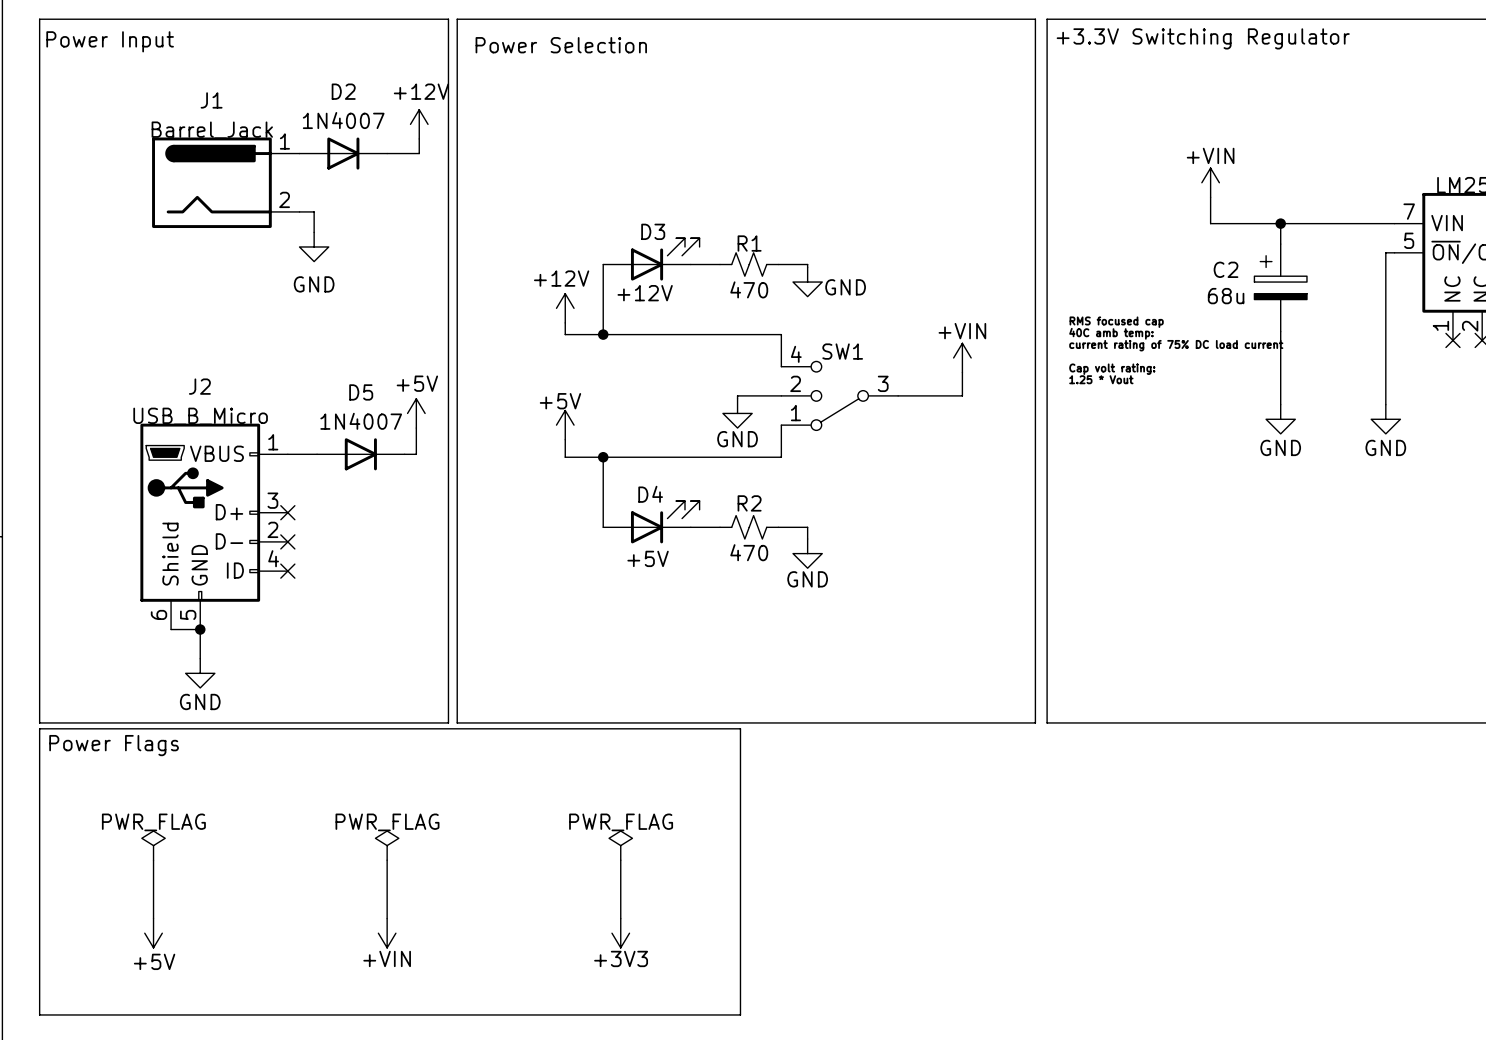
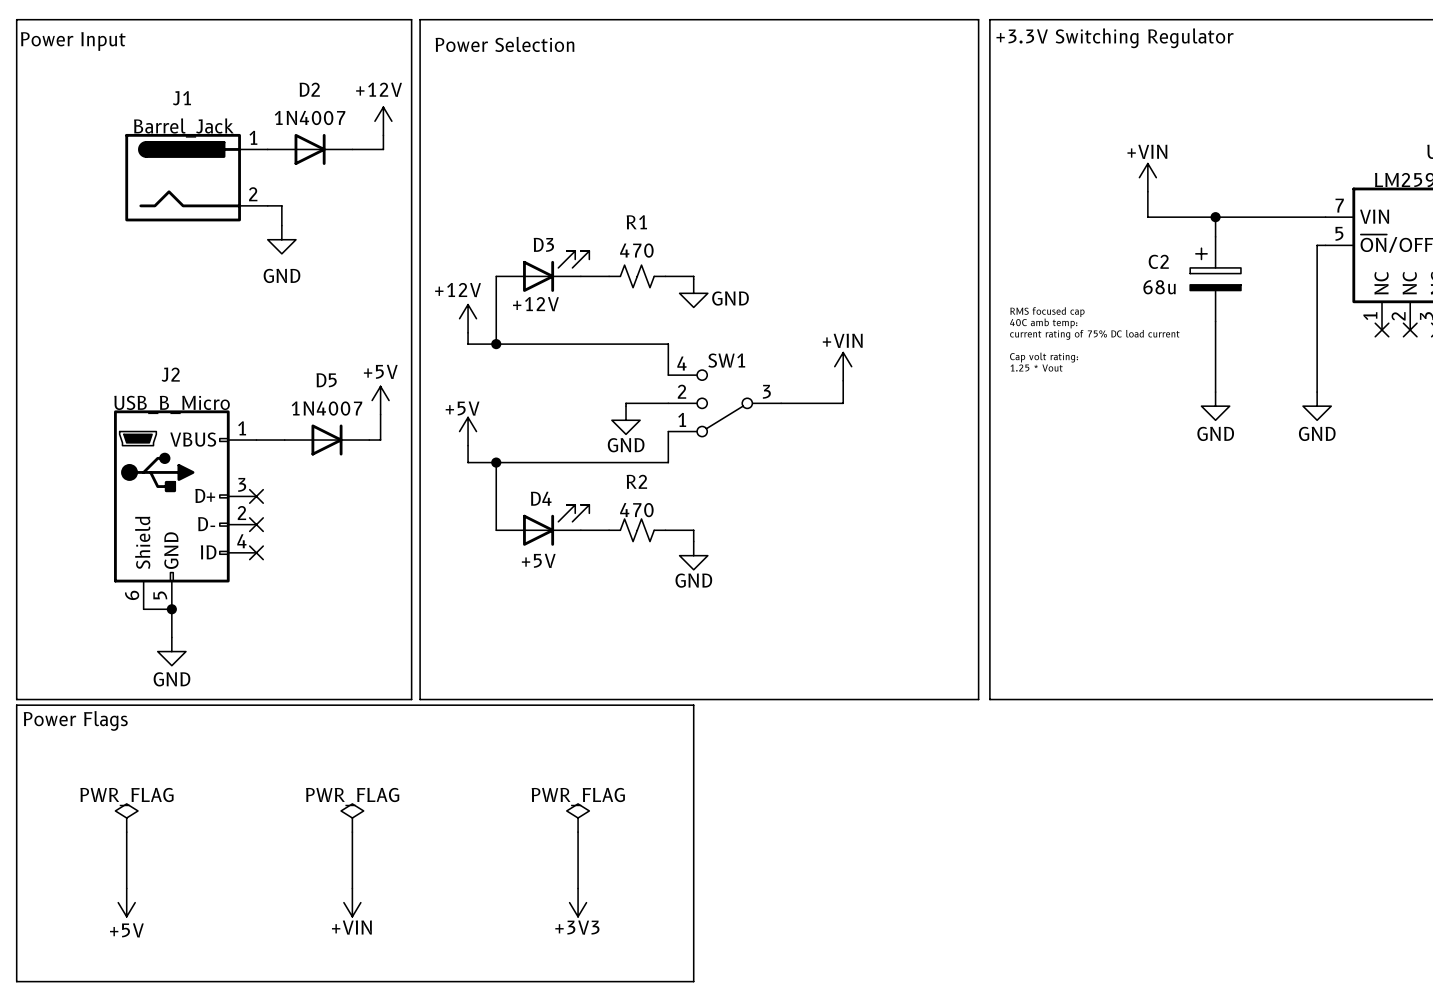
R1 name position: R1 (749, 243) -> R1 (636, 222)
D3 position: (651, 259) -> (542, 271)
wire: (603, 264) (603, 334) -> (496, 276) (496, 344)
wire: (690, 264) (720, 264) -> (580, 276) (609, 276)
R1 position: (749, 264) -> (637, 276)
wire: (778, 264) (807, 264) (807, 267) -> (665, 276) (693, 276) (693, 279)
power symbol: GND (807, 282) -> none
R1 value position: 470 (749, 289) -> 470 (636, 250)
power symbol: none -> GND (693, 293)
power symbol position: +12V (565, 308) -> +12V (468, 318)
wire: (565, 322) (565, 334) (781, 334) (781, 366) -> none
junction: (603, 334) -> none
wire: none -> (468, 332) (468, 344) (668, 344) (668, 375)
junction: none -> (496, 344)
power symbol position: +VIN (962, 357) -> +VIN (843, 366)
wire: (962, 372) (962, 395) (898, 395) -> (843, 380) (843, 403) (781, 403)
wire: (781, 395) (737, 395) (737, 398) -> (668, 403) (626, 403) (626, 406)
SW1 position: (839, 395) -> (724, 403)
power symbol: GND (737, 413) -> none
power symbol position: +5V (565, 425) -> +5V (468, 431)
wire: (781, 425) (781, 457) (565, 457) (565, 439) -> none
power symbol: none -> GND (626, 420)
wire: none -> (668, 431) (668, 462) (468, 462) (468, 445)
wire: (603, 457) (603, 527) -> (496, 462) (496, 530)
junction: (603, 457) -> none
junction: none -> (496, 462)
R2 name position: R2 (749, 503) -> R2 (636, 481)
D4 position: (651, 522) -> (542, 525)
wire: (690, 527) (720, 527) -> (580, 530) (609, 530)
R2 position: (749, 527) -> (637, 530)
wire: (778, 527) (807, 527) (807, 539) -> (665, 530) (693, 530) (693, 541)
R2 value position: 470 (749, 552) -> 470 (636, 510)
power symbol position: GND (807, 553) -> GND (693, 555)

